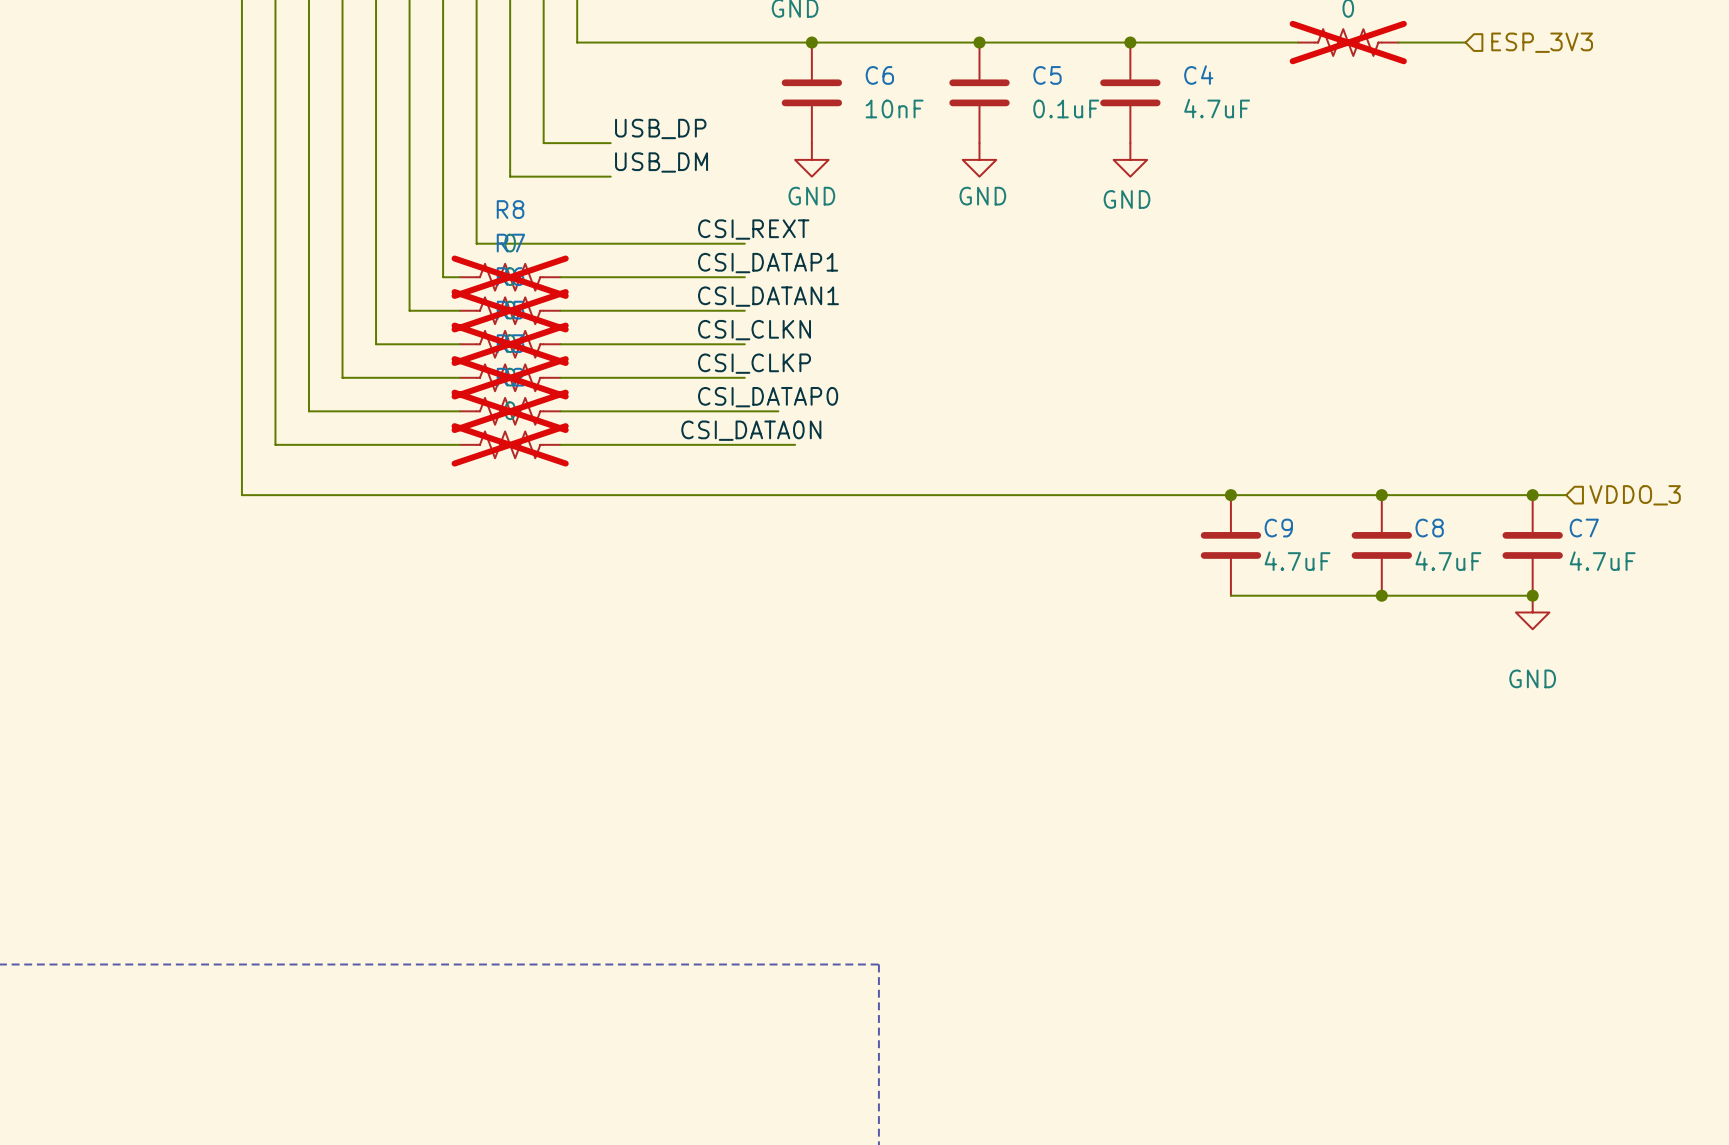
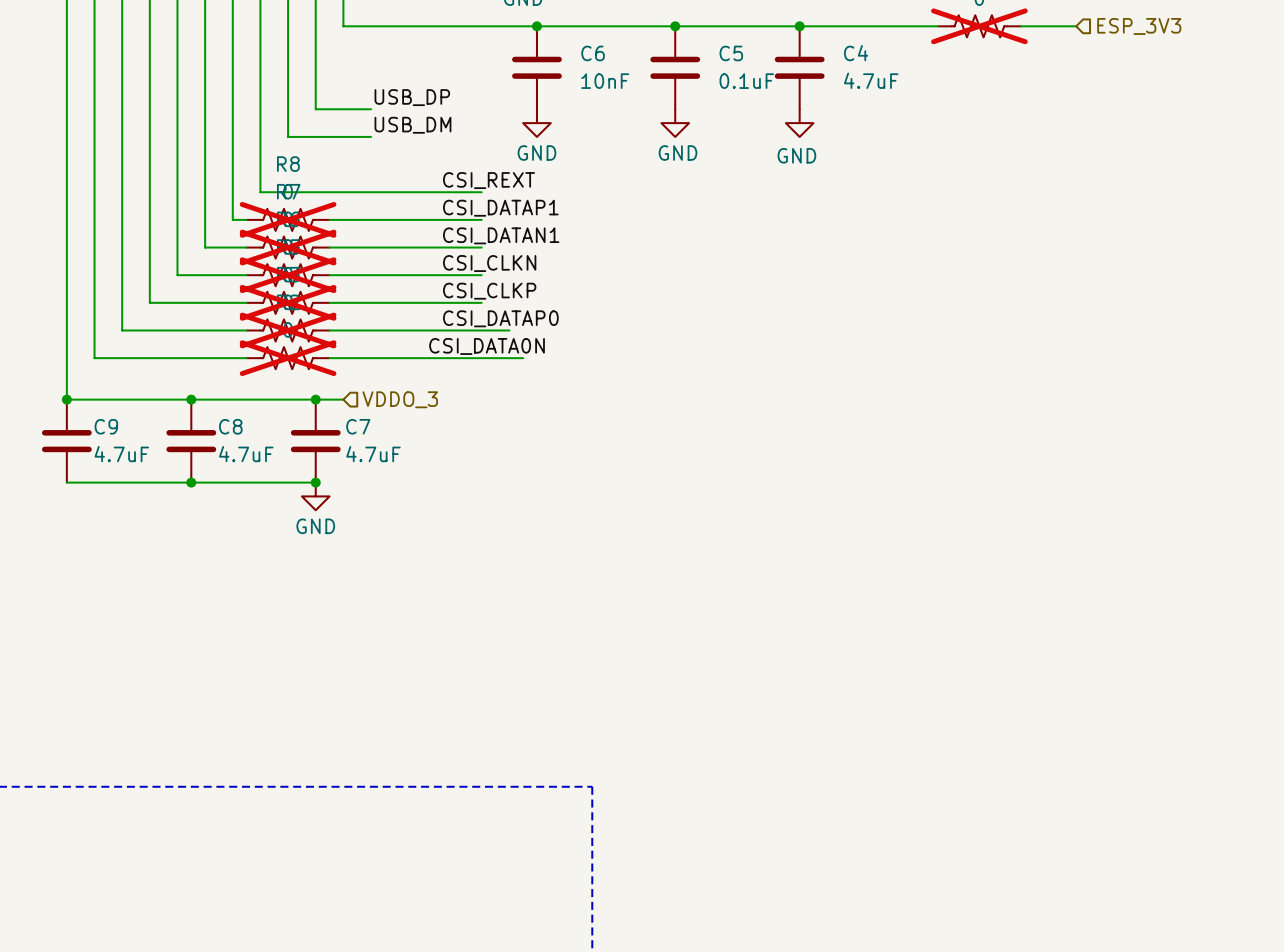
junction: none -> (66, 399)
junction: none -> (191, 399)
junction: none -> (315, 399)
wire: (577, 495) (1566, 495) -> none
hierarchical label: none -> VDDO_3 (400, 399)
junction: (1230, 495) -> none
junction: (1381, 495) -> none
junction: (1532, 495) -> none
hierarchical label: VDDO_3 (1635, 495) -> none
C9 position: (1230, 545) -> (66, 441)
C8 position: (1381, 545) -> (191, 441)
C7 position: (1532, 545) -> (315, 441)
wire: none -> (66, 482) (315, 482)
junction: none -> (191, 482)
junction: none -> (315, 482)
wire: (1230, 595) (1532, 595) -> none
junction: (1381, 595) -> none
junction: (1532, 595) -> none
power symbol: none -> GND (315, 496)
power symbol: GND (1532, 612) -> none

